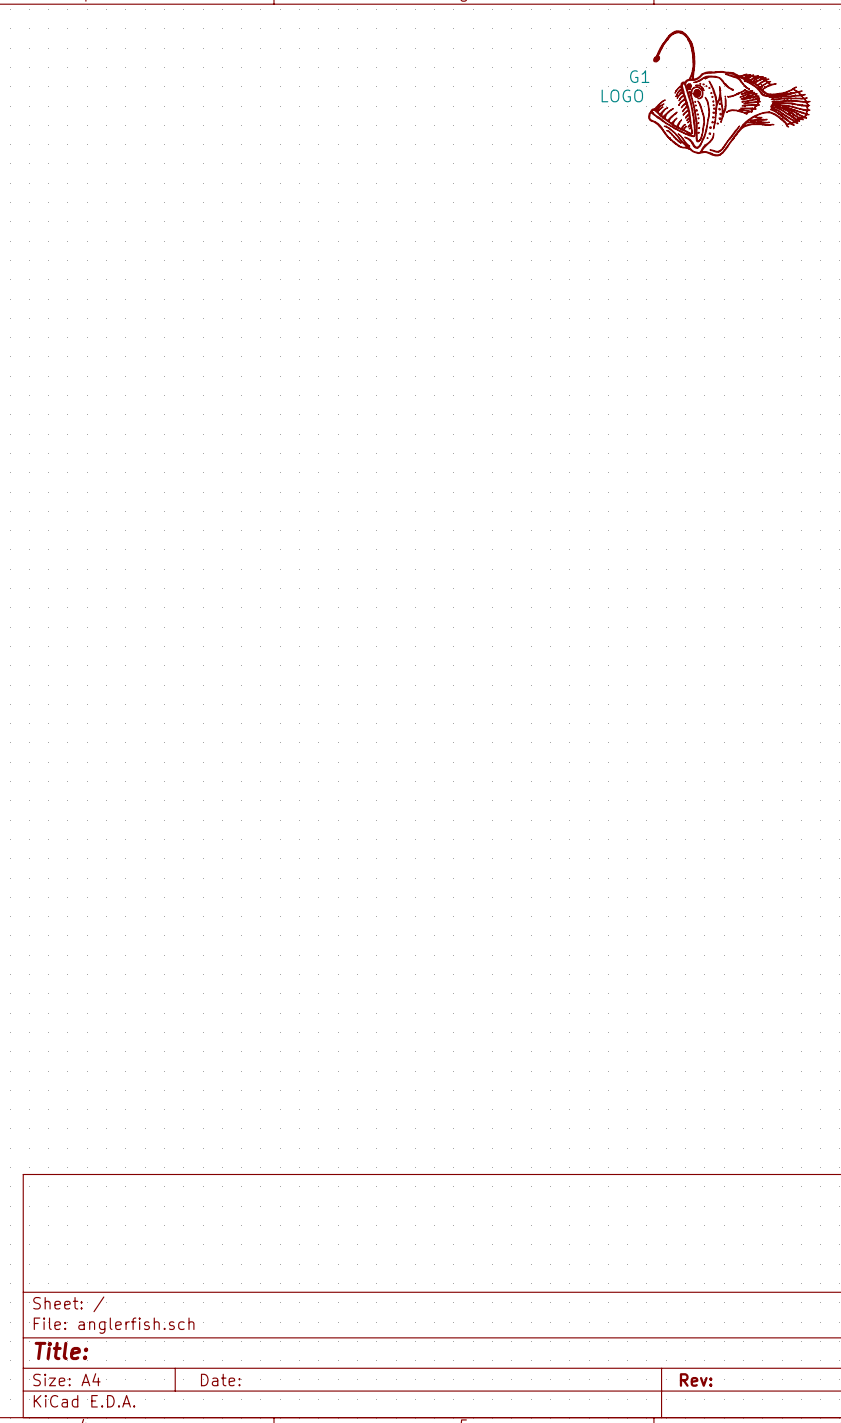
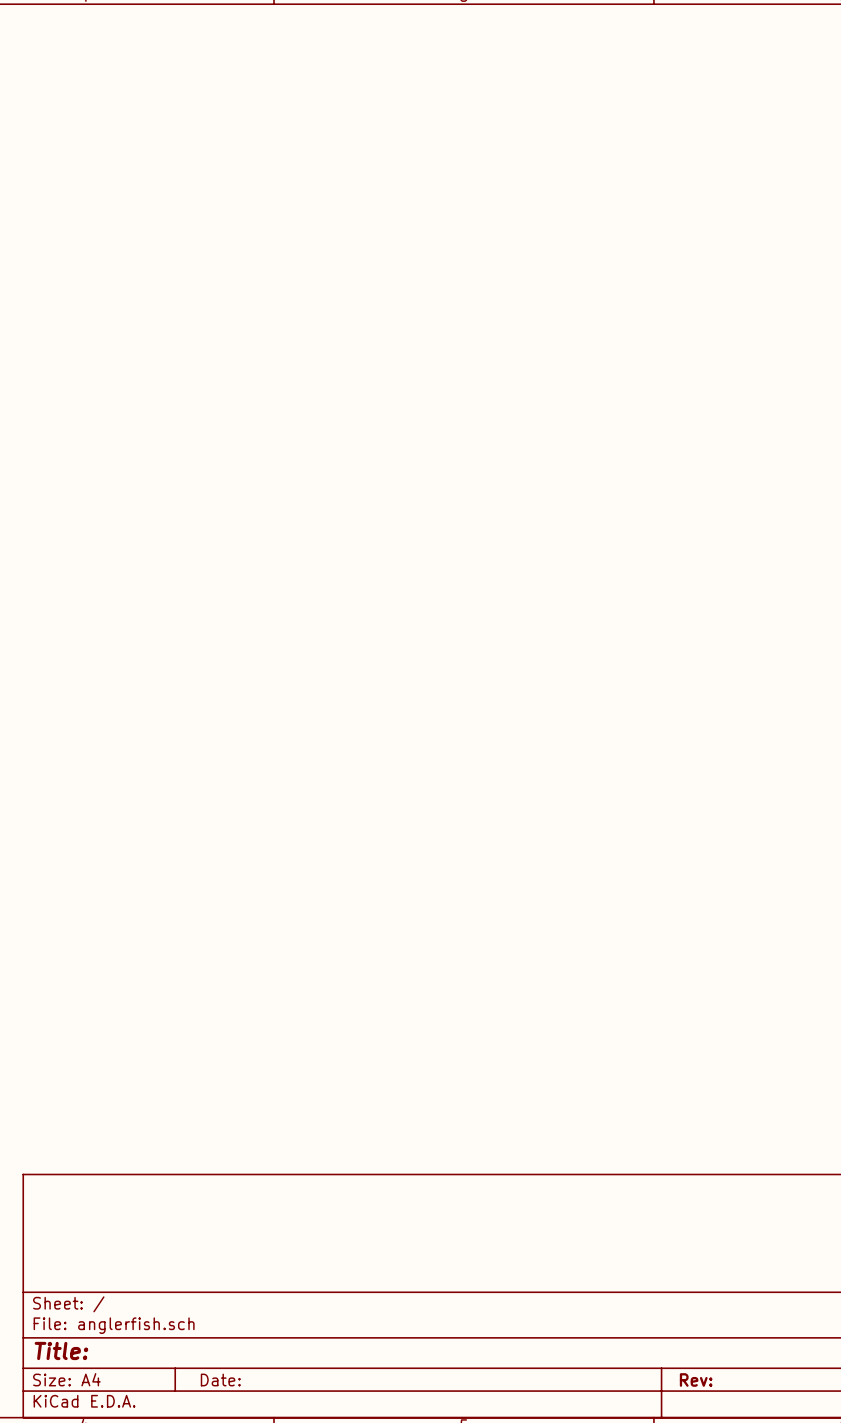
G1: LOGO (729, 93) -> none

